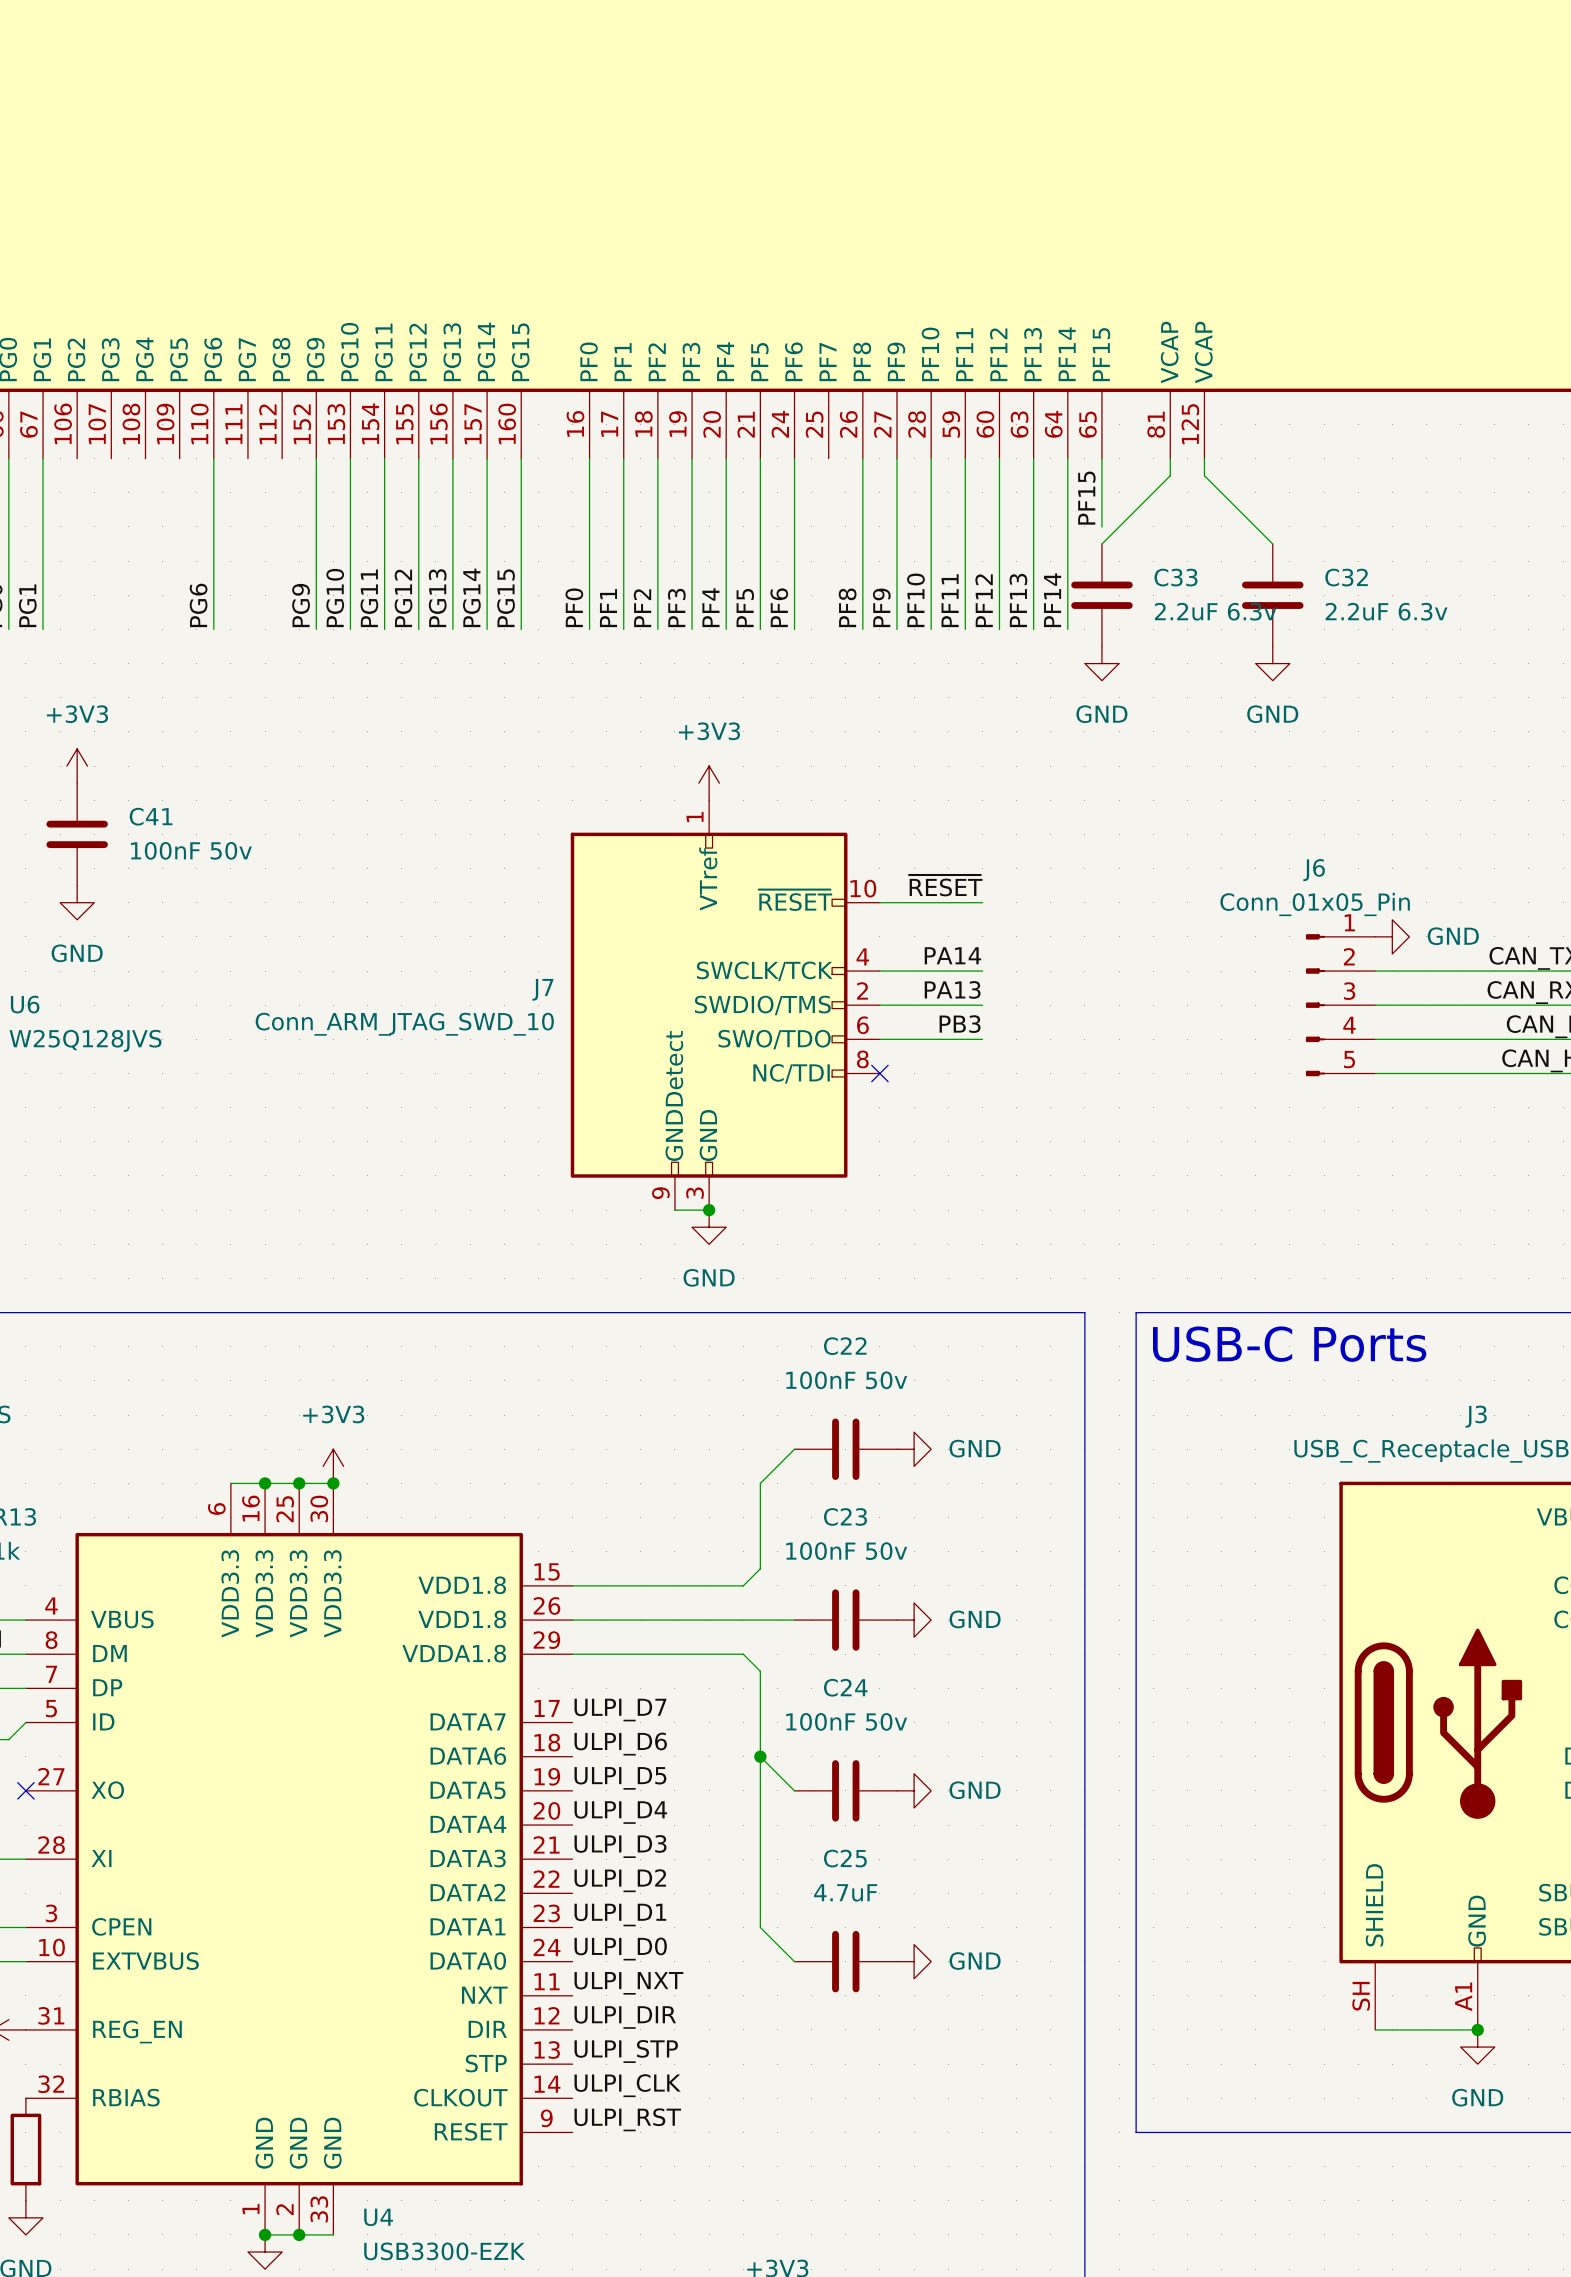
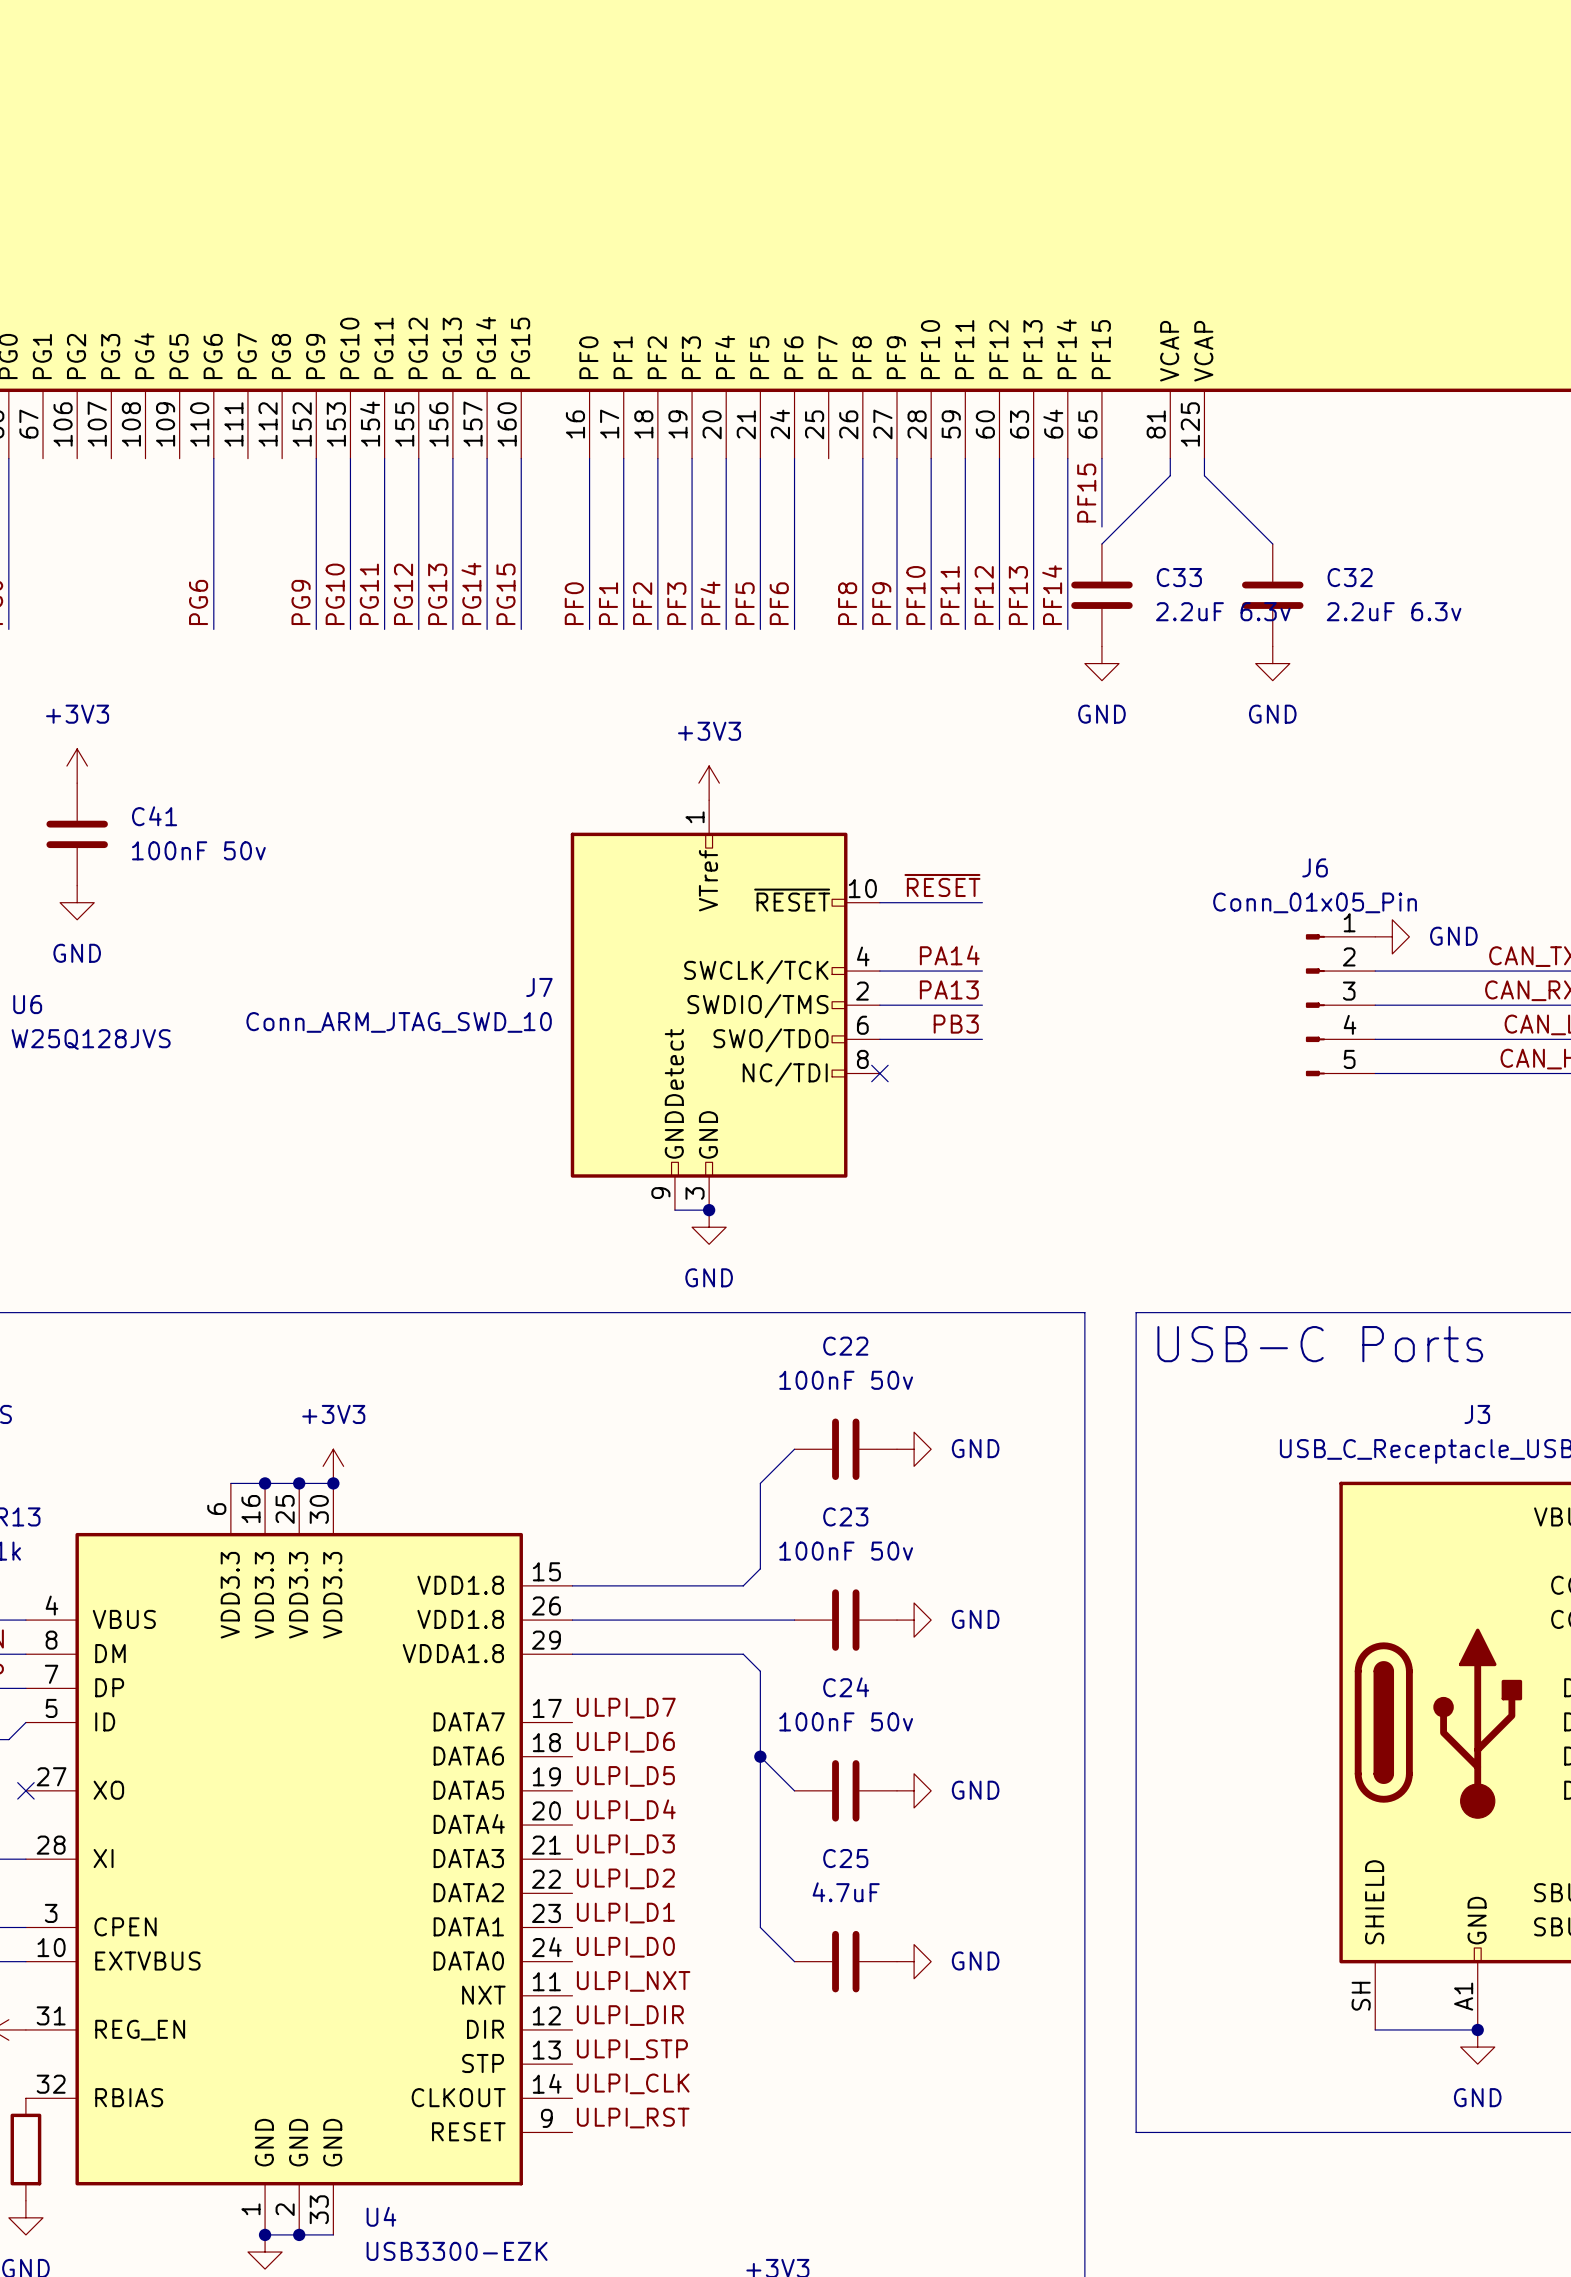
wire: (43, 458) (43, 629) -> none
label: PG1 (27, 605) -> none

